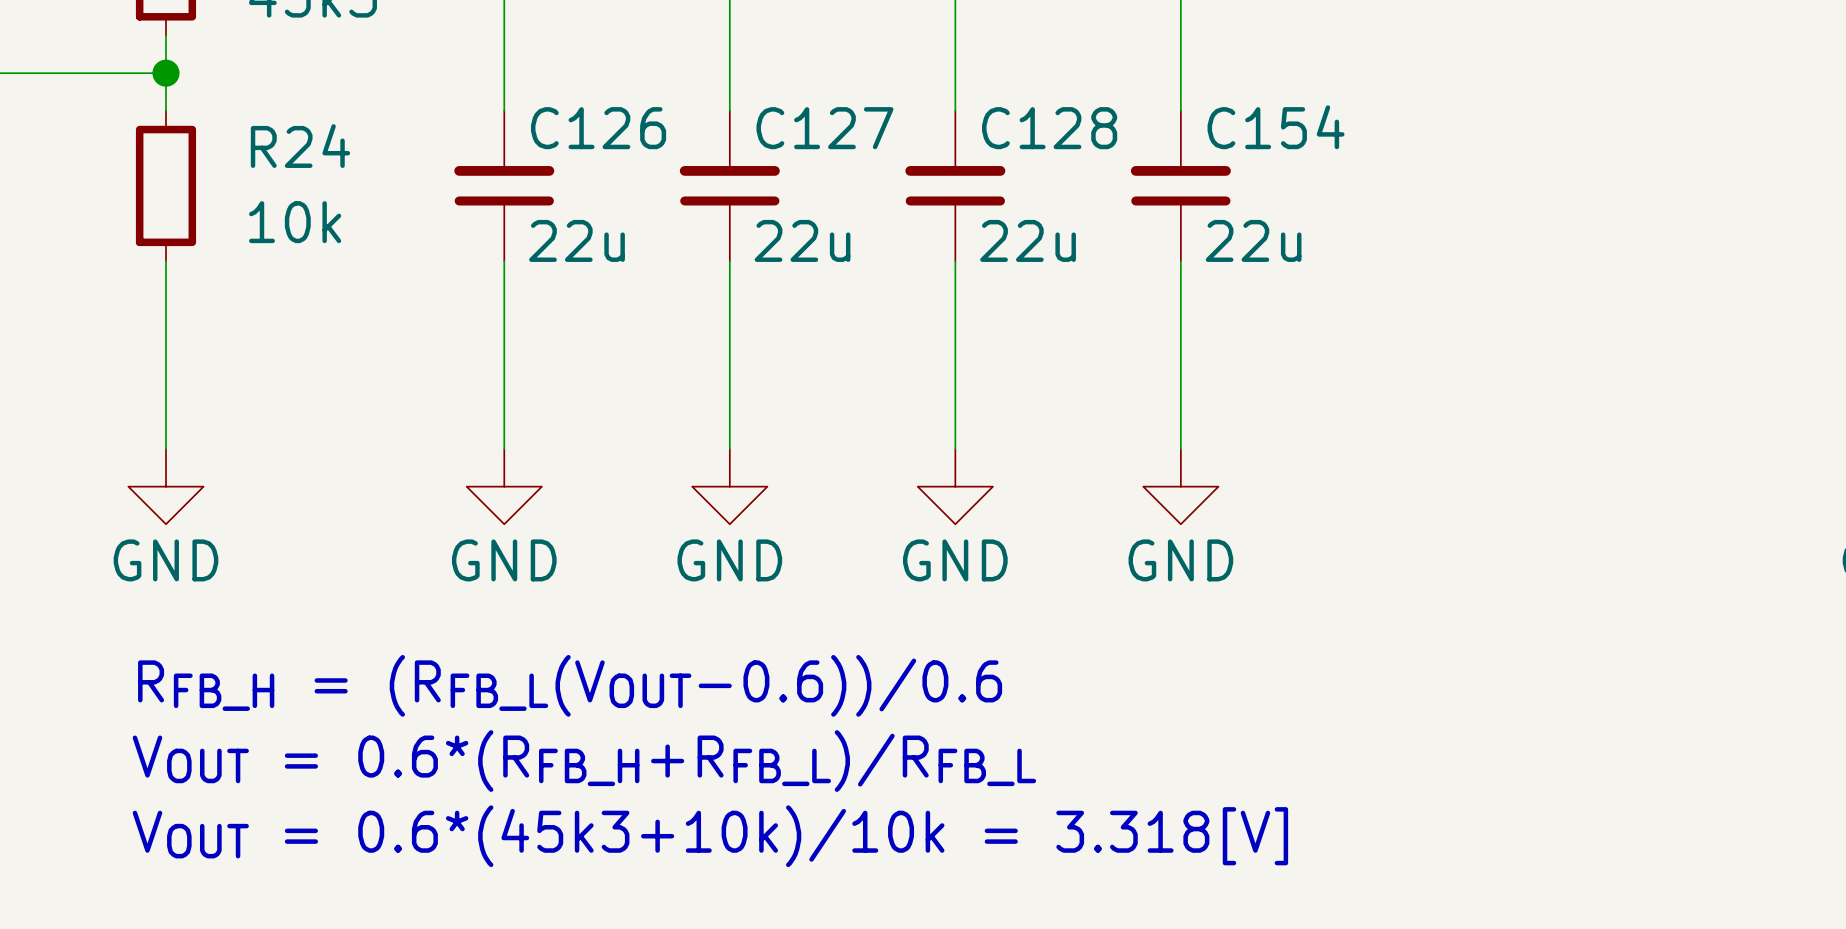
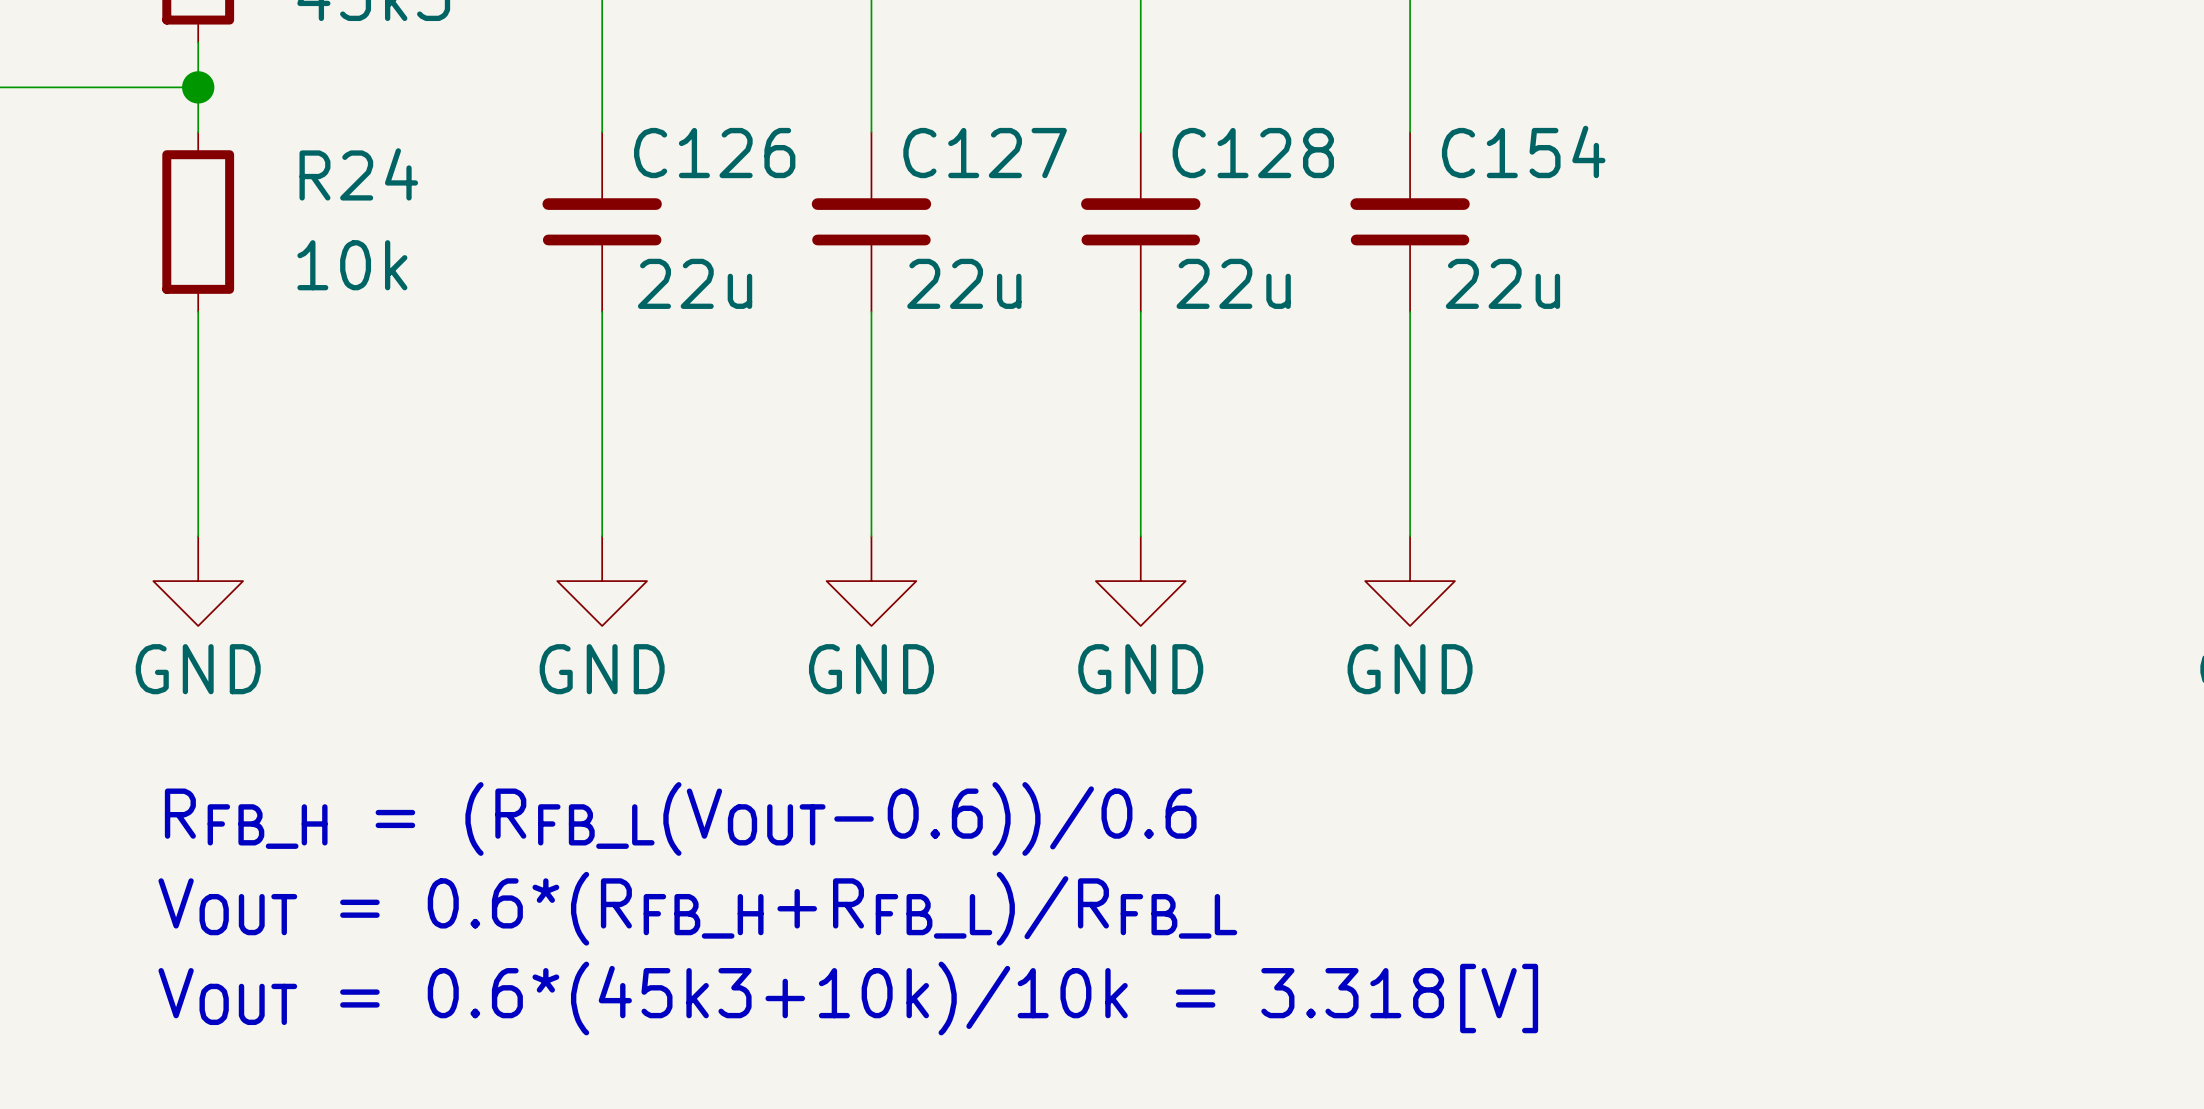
C126 text position: 22u (577, 240) -> 22u (1502, 283)
C127 text position: 22u (802, 240) -> 22u (1233, 283)
C128 text position: 22u (1028, 240) -> 22u (964, 283)
C154 text position: 22u (1253, 240) -> 22u (695, 283)

